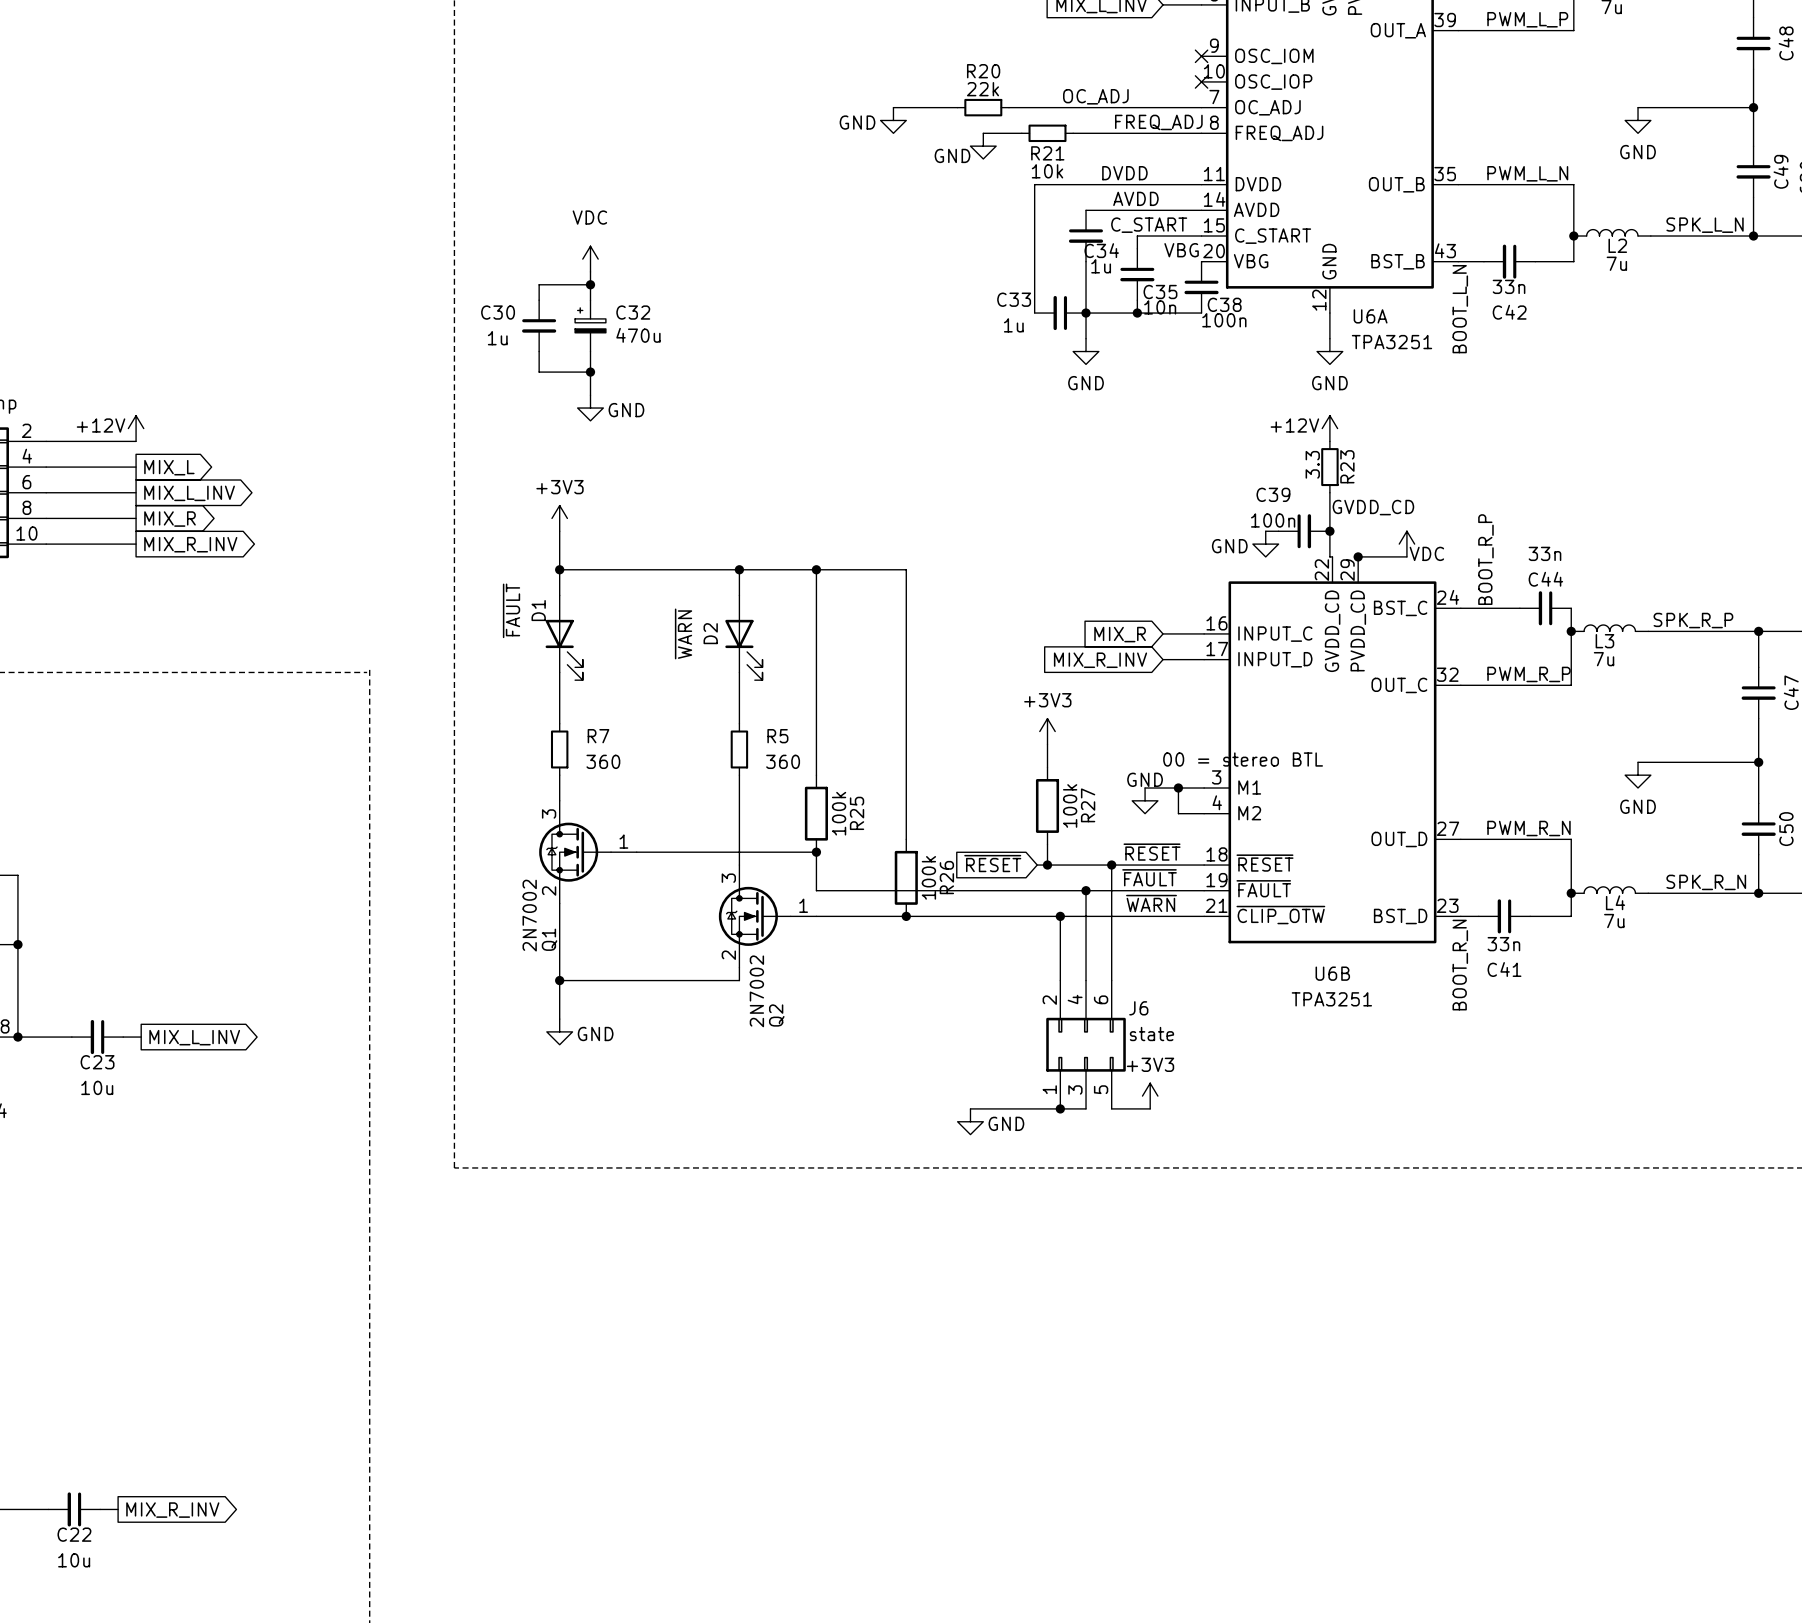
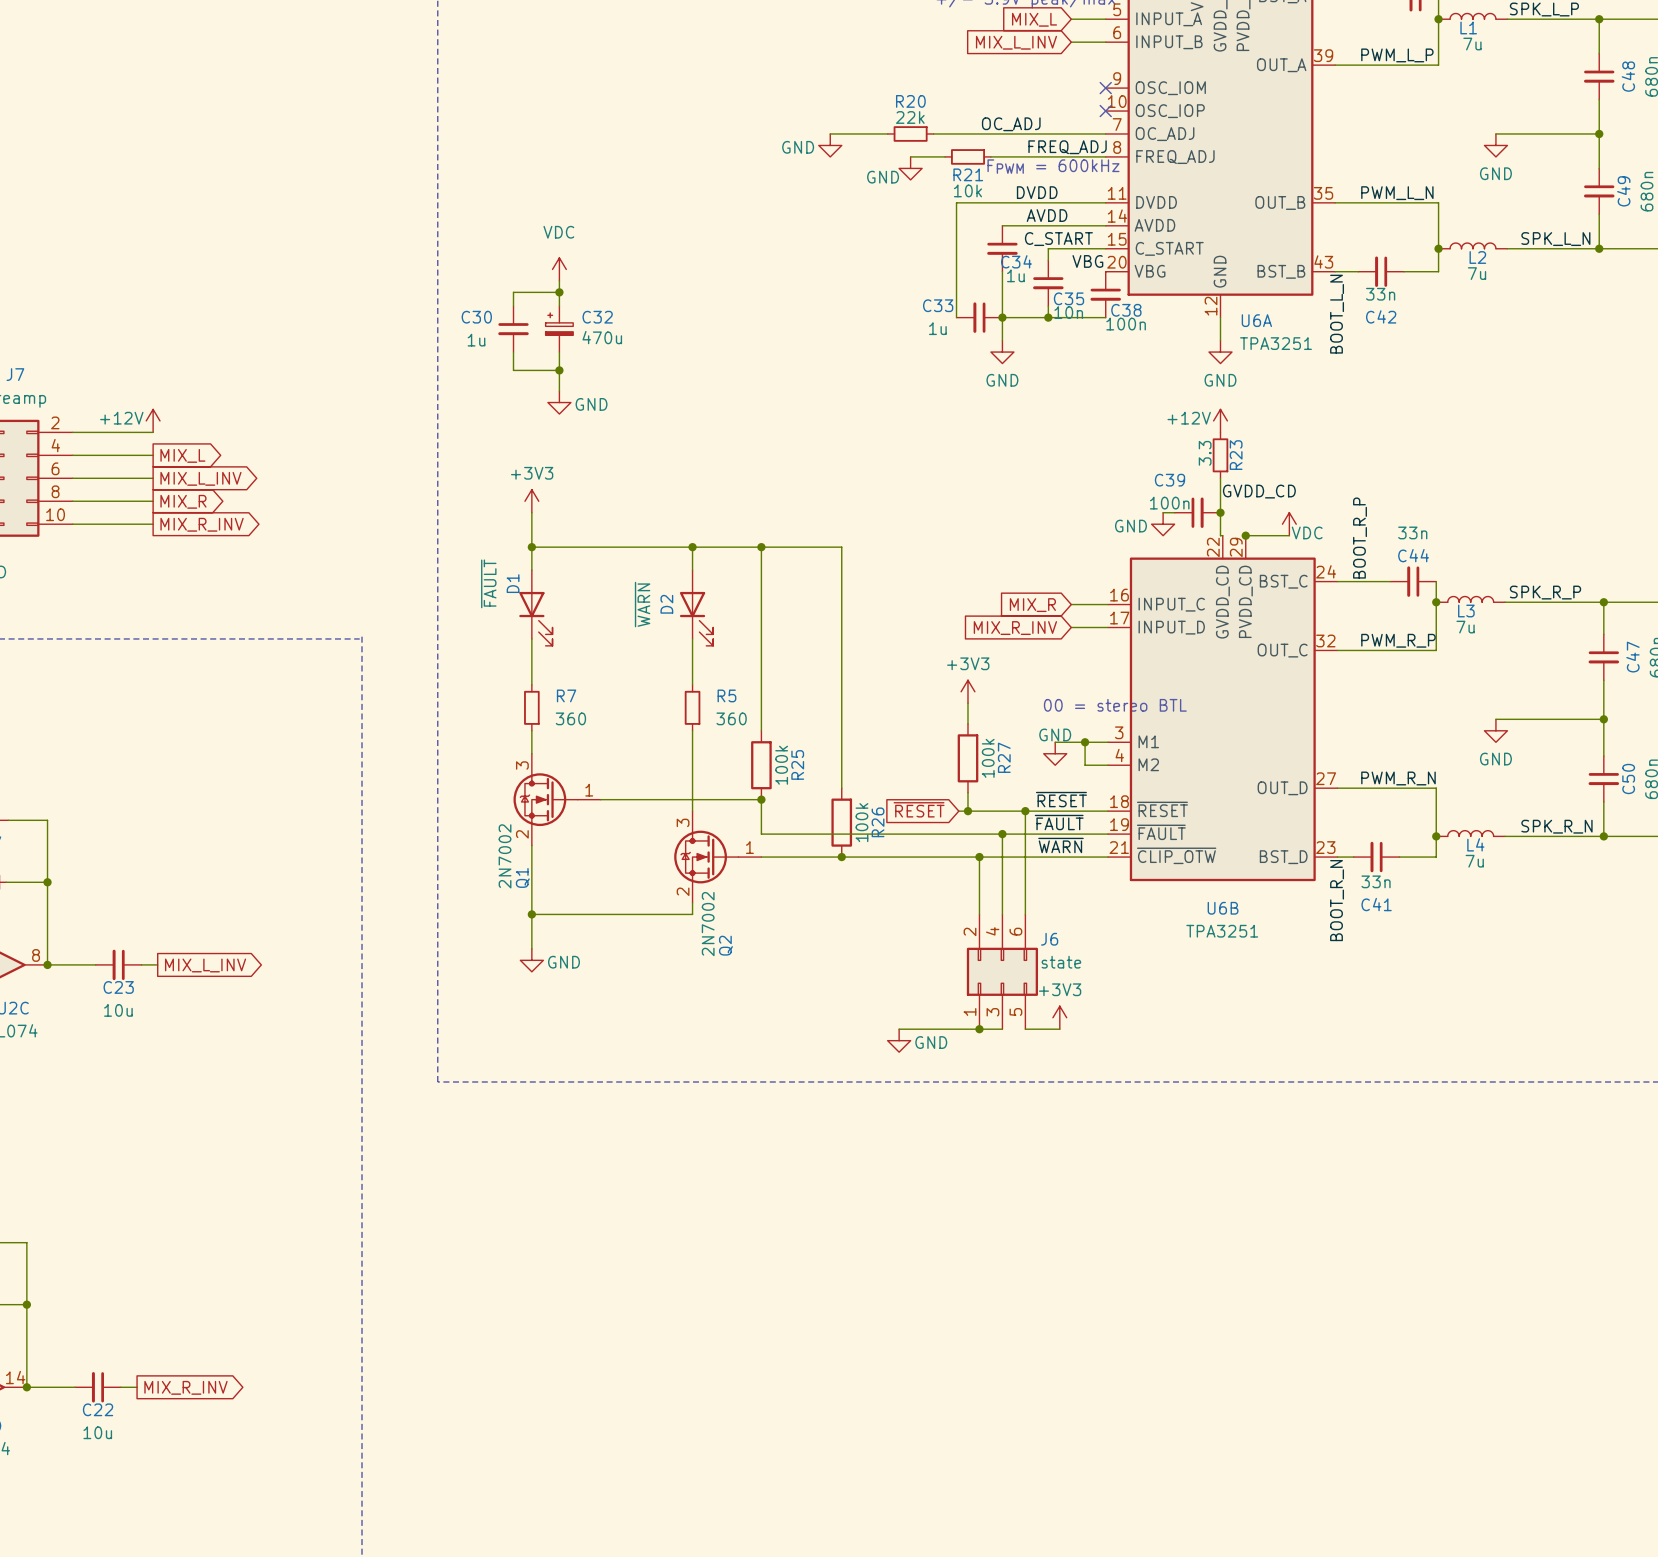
text: none -> FPWM = 600kHz (1053, 166)
text position: 00 = stereo BTL (1243, 759) -> 00 = stereo BTL (1115, 705)

